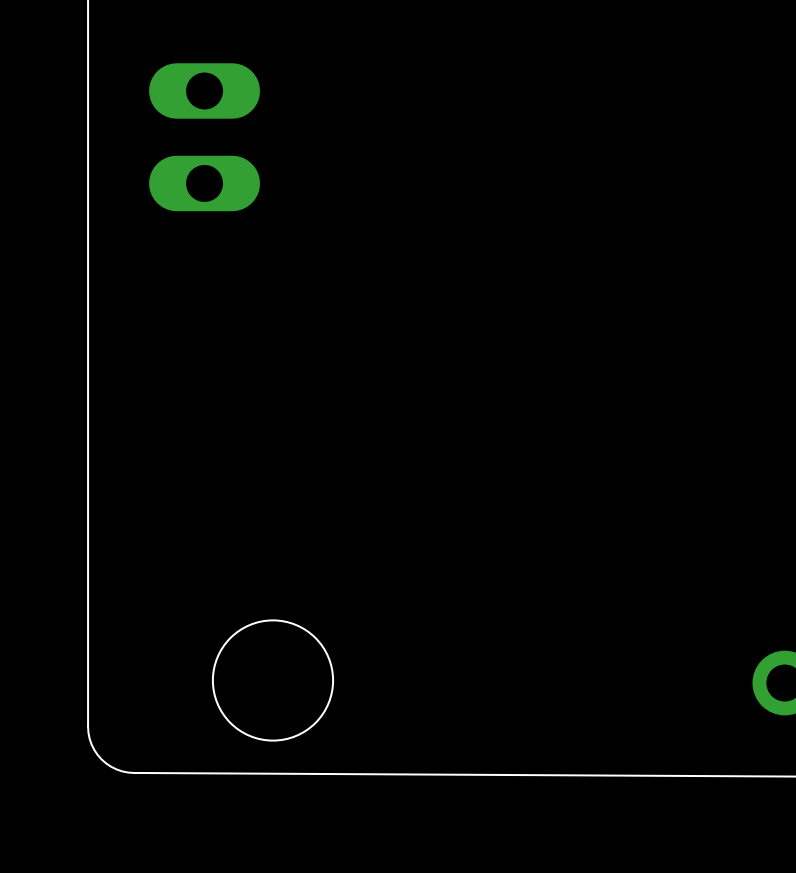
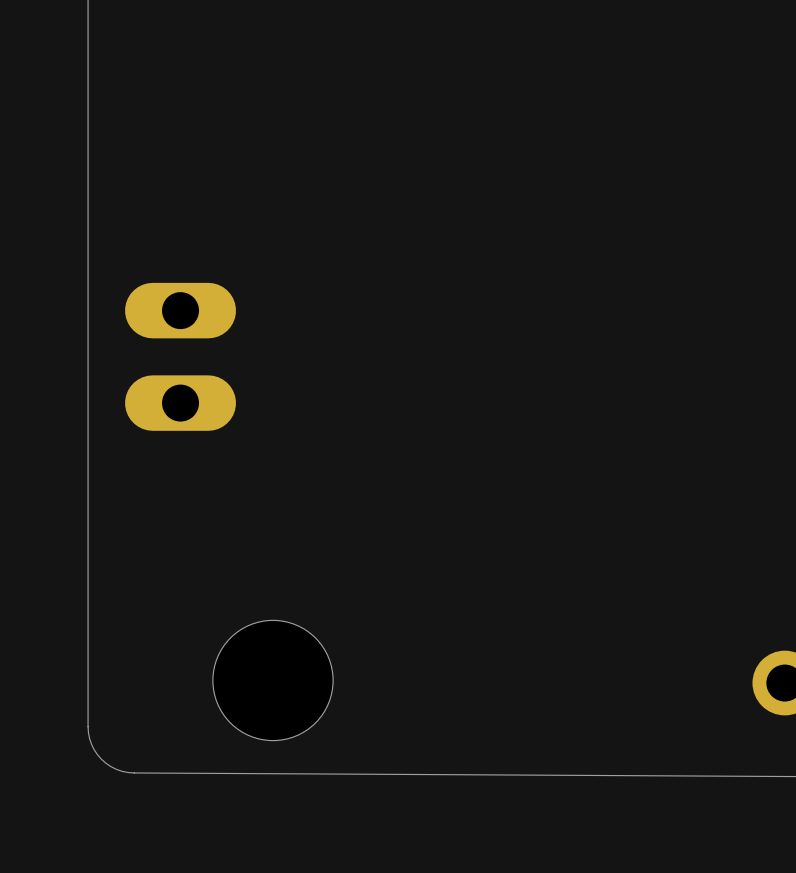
part position: (204, 137) -> (180, 356)

